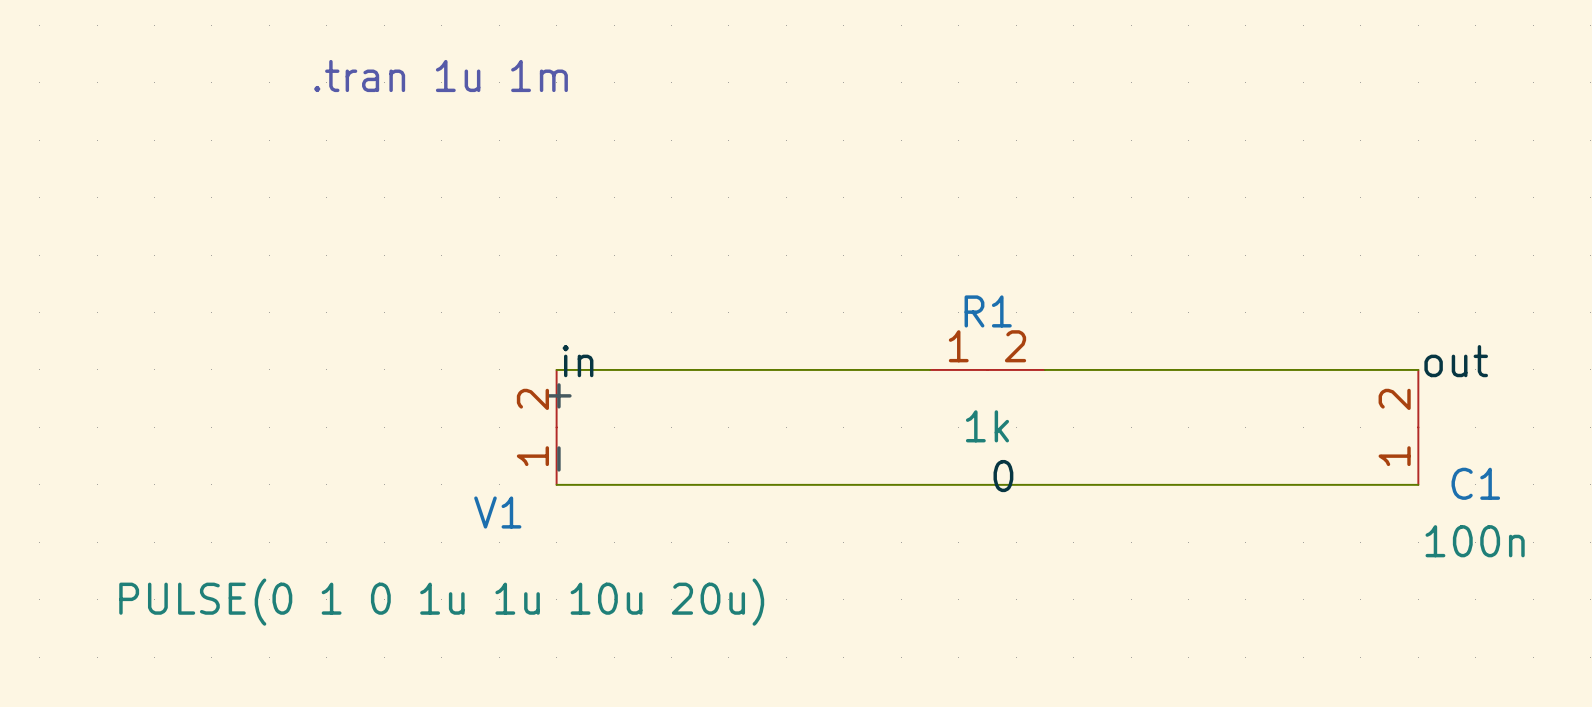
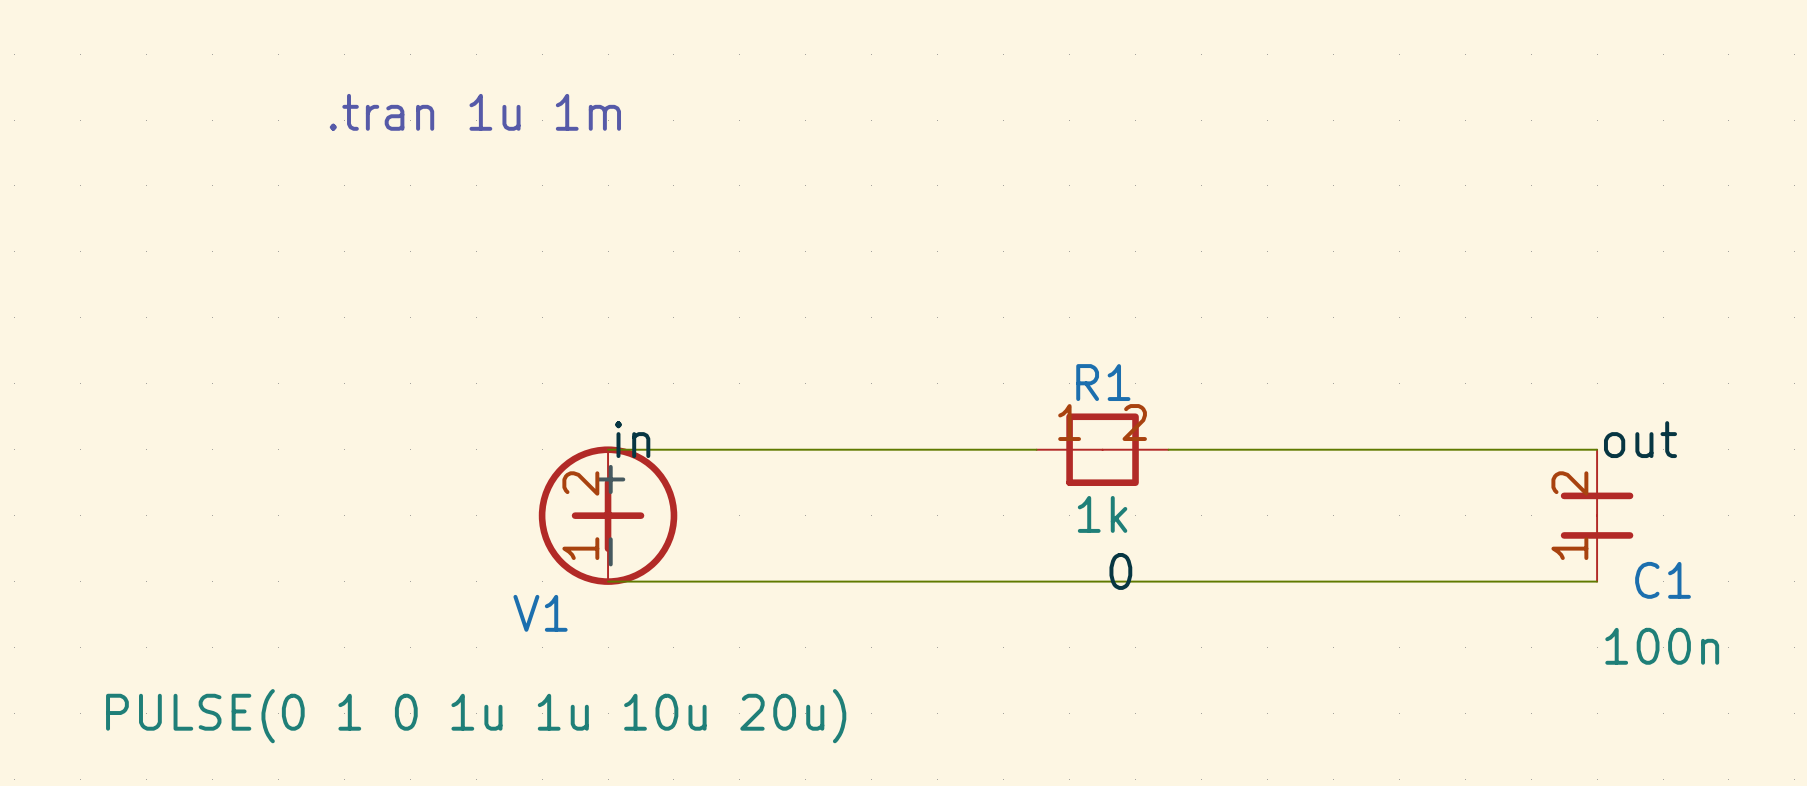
V1 symbol: [556, 369, 557, 485] -> [538, 446, 678, 585]
R1 symbol: [930, 369, 1045, 370] -> [1036, 413, 1169, 486]
C1 symbol: [1418, 369, 1419, 485] -> [1560, 449, 1634, 582]

